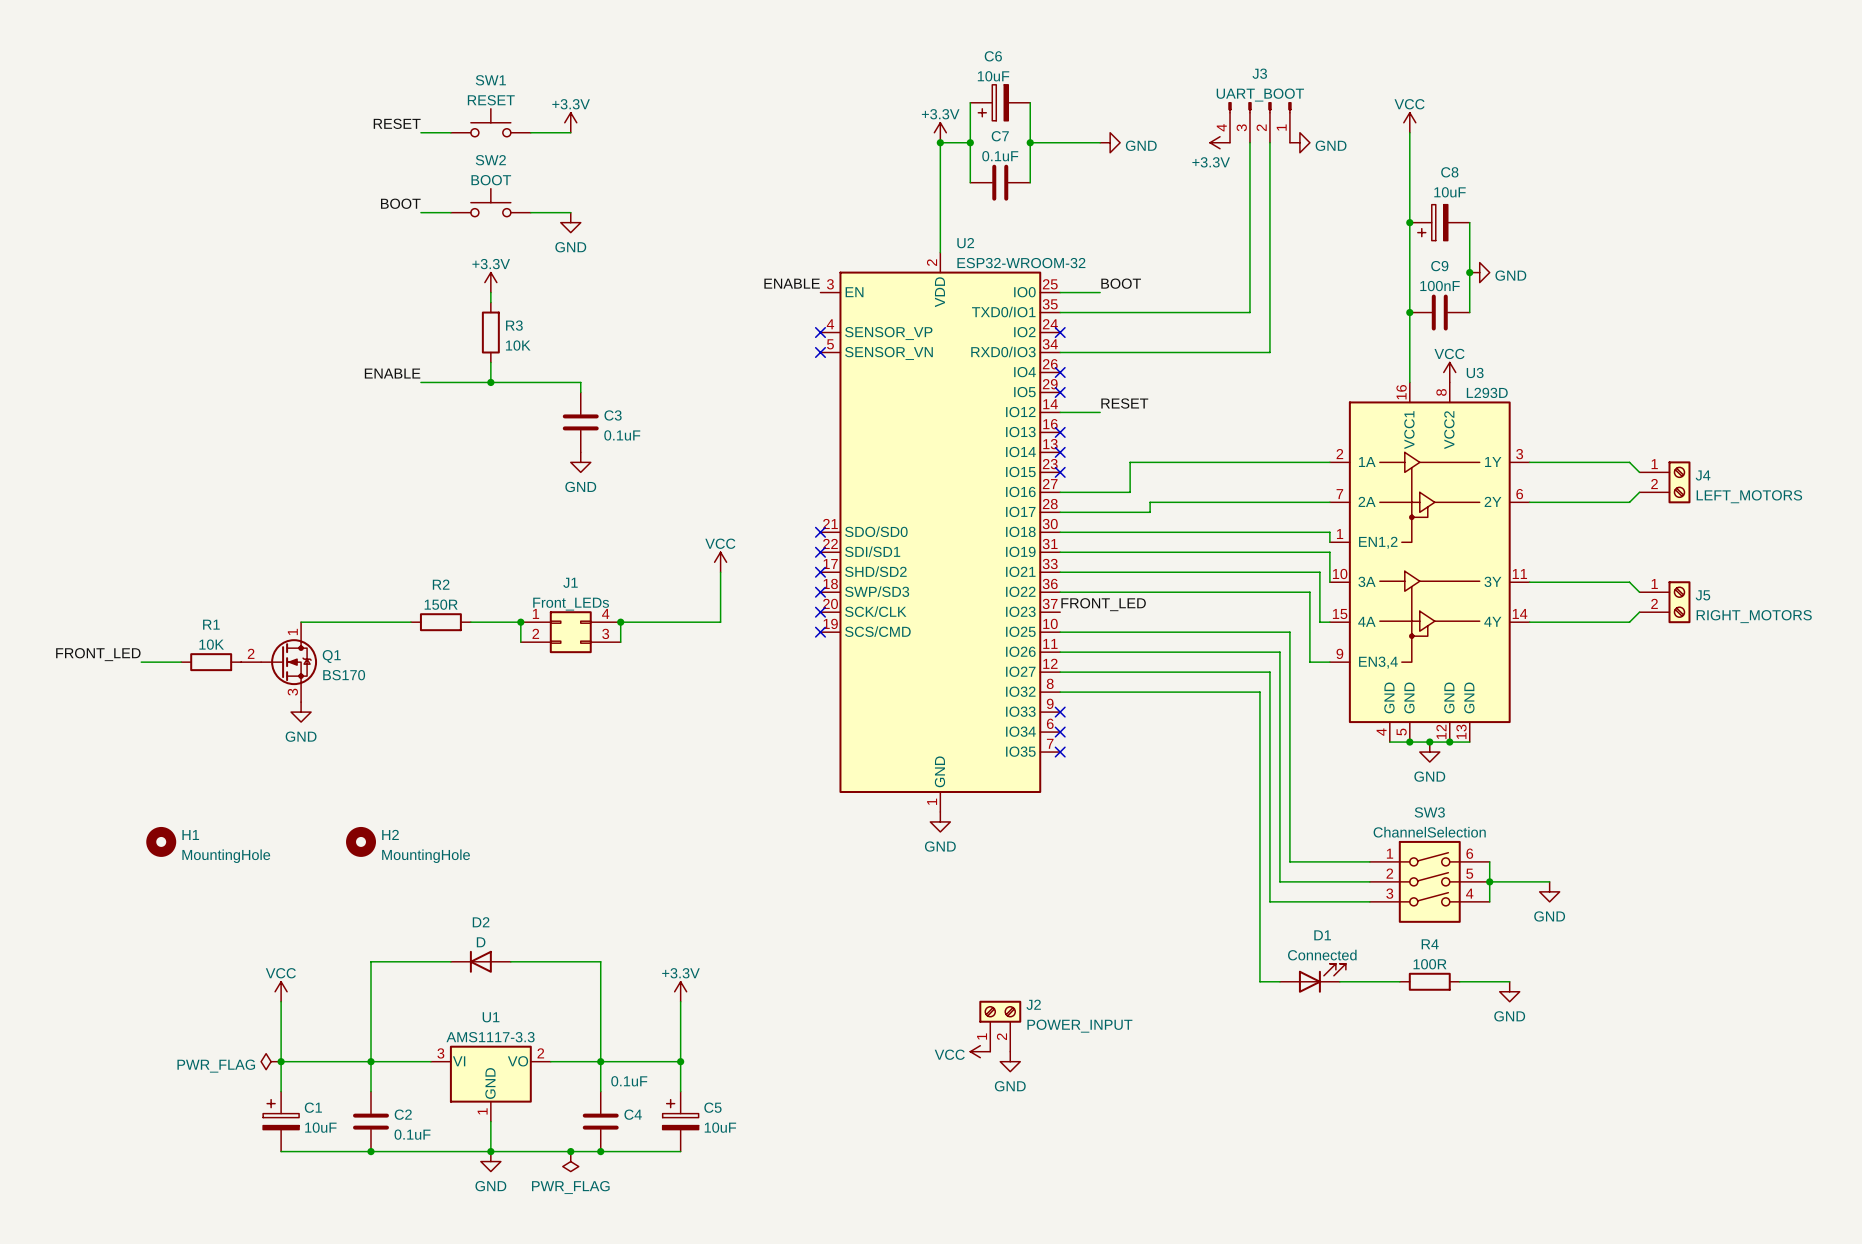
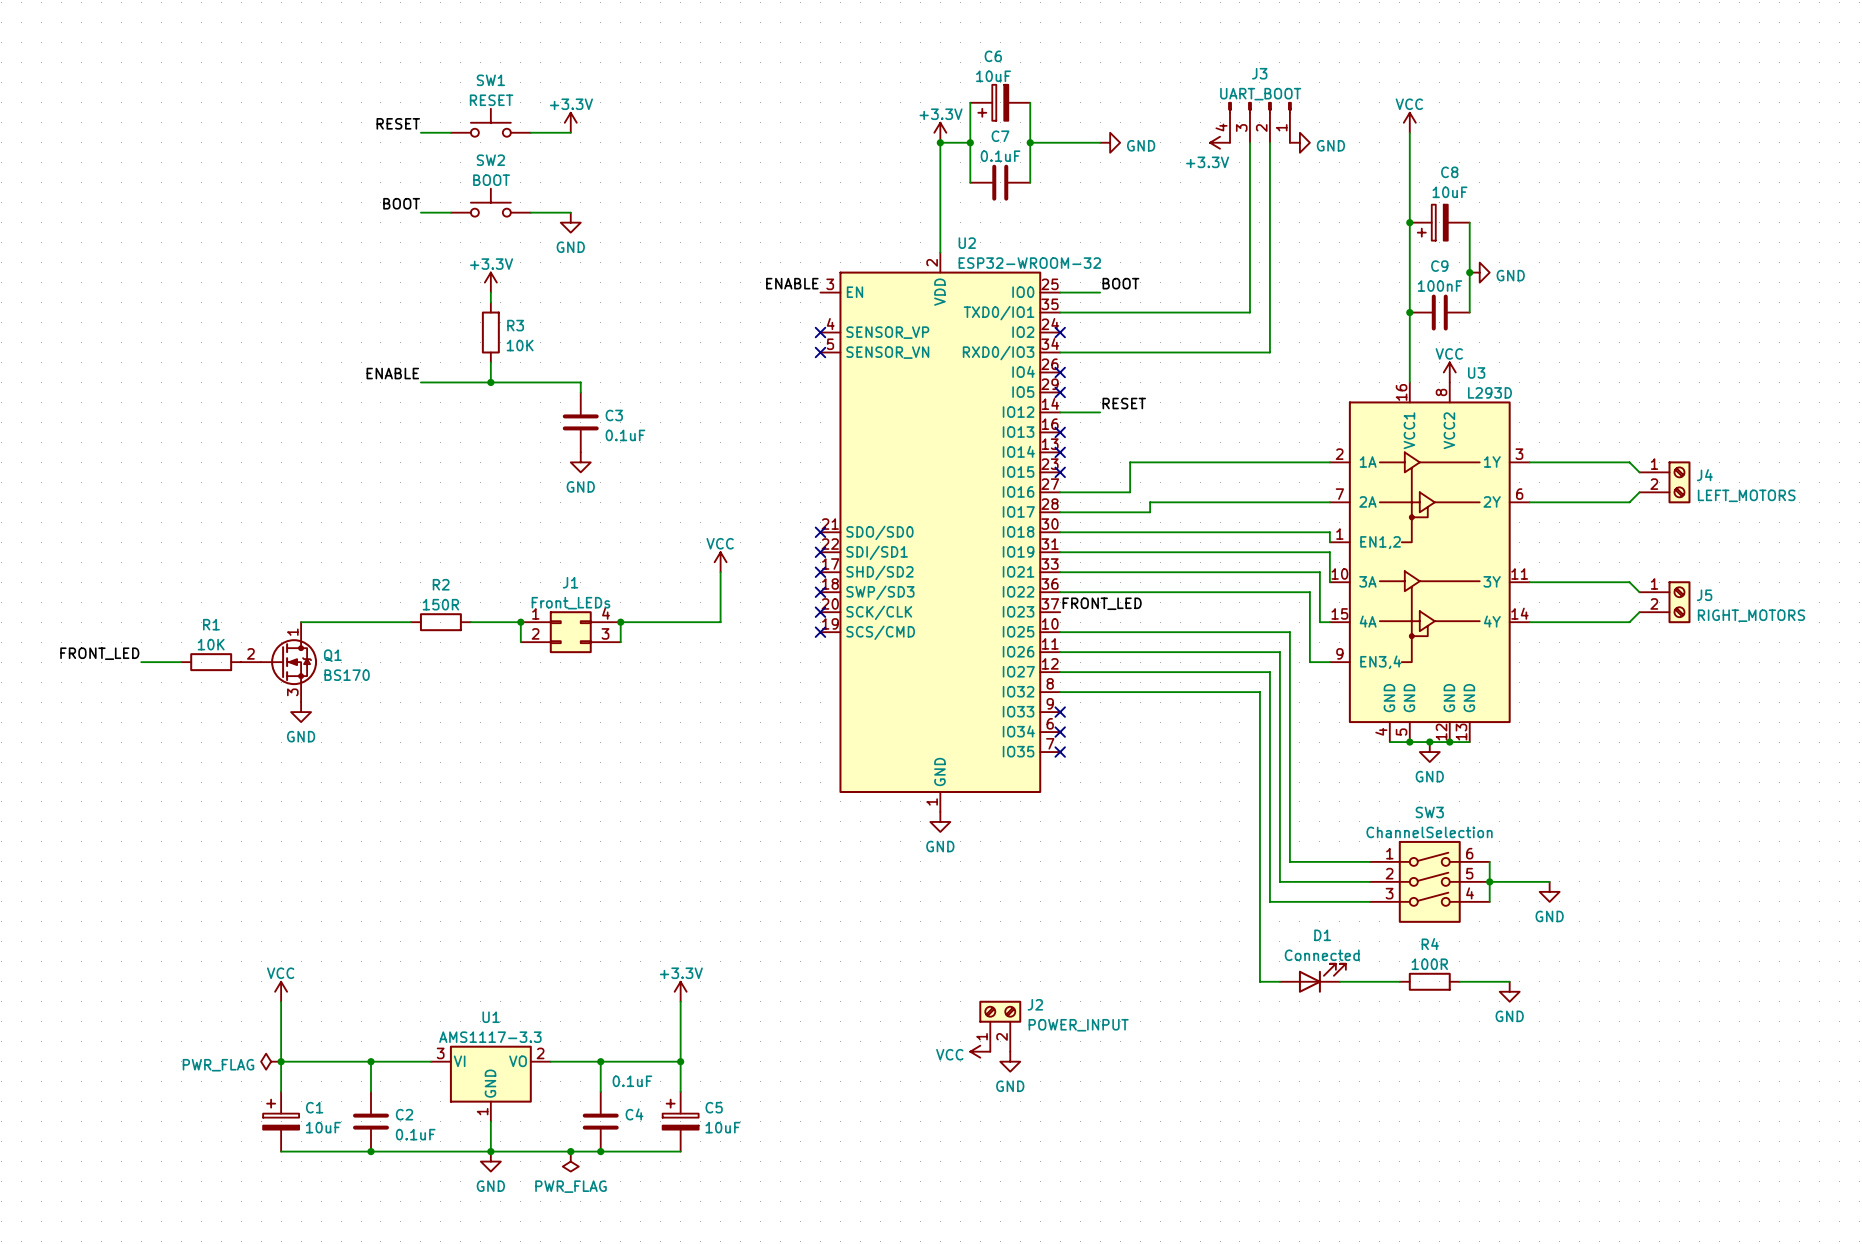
H1: MountingHole (161, 841) -> none
H2: MountingHole (361, 841) -> none
wire: (450, 961) (370, 961) (370, 1061) -> none
D2: D (480, 961) -> none
wire: (510, 961) (600, 961) (600, 1061) -> none

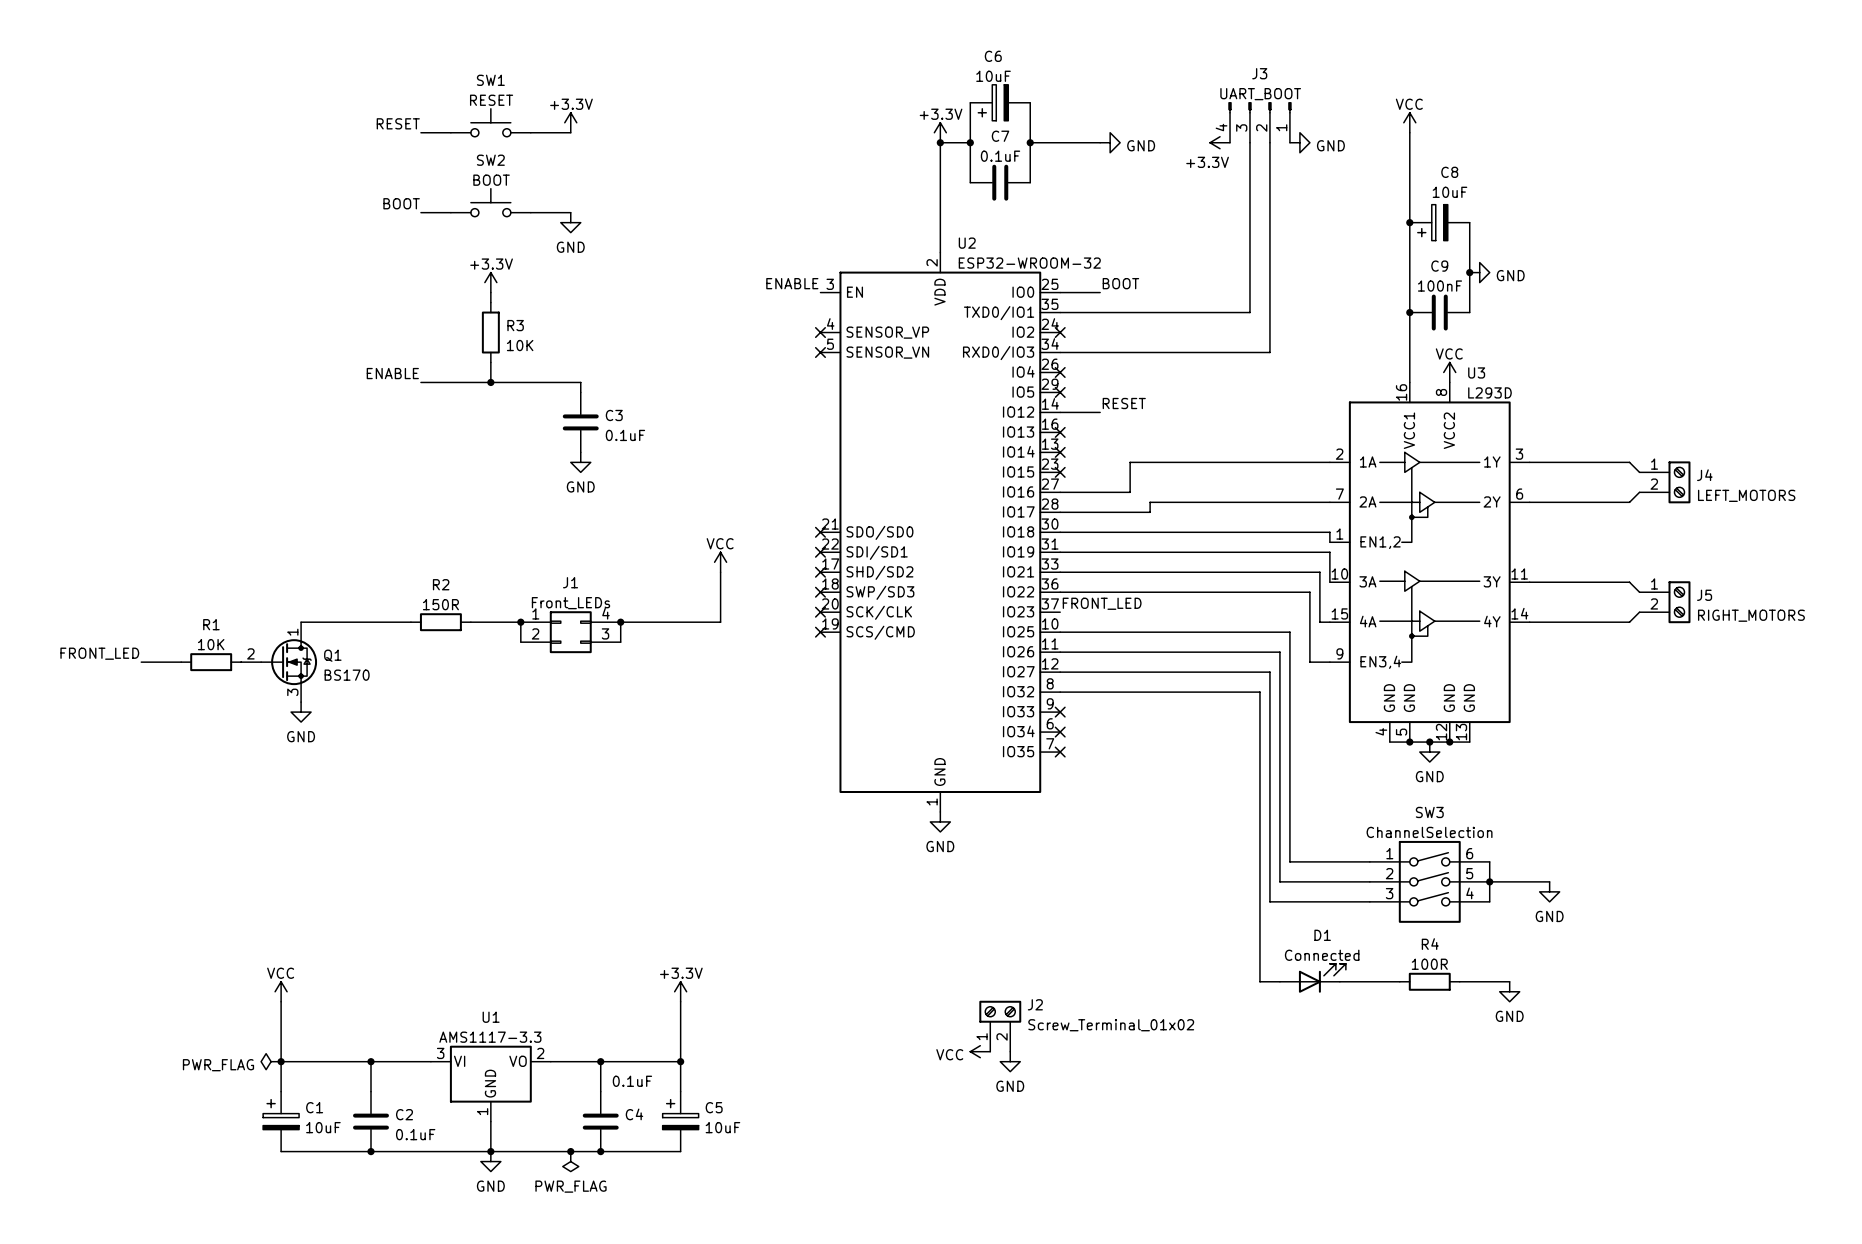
J2 value: POWER_INPUT (1078, 1025) -> Screw_Terminal_01x02 (1111, 1025)

